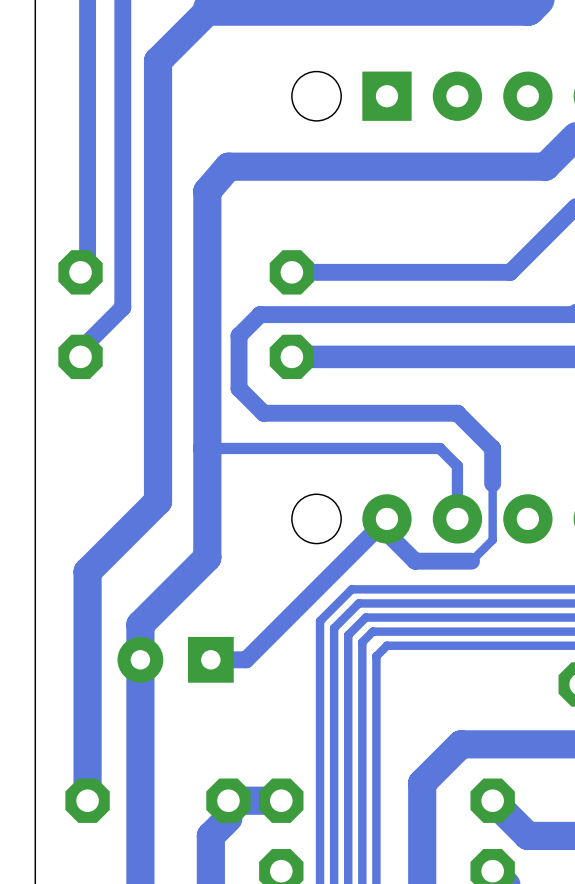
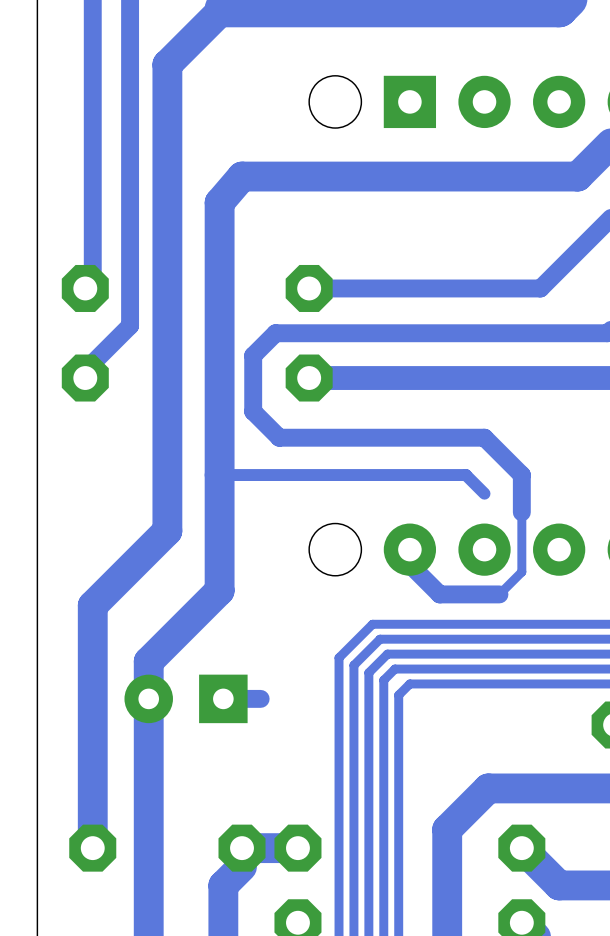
track: (457, 466) (457, 518) -> none
track: (386, 533) (386, 518) (246, 659) -> none

